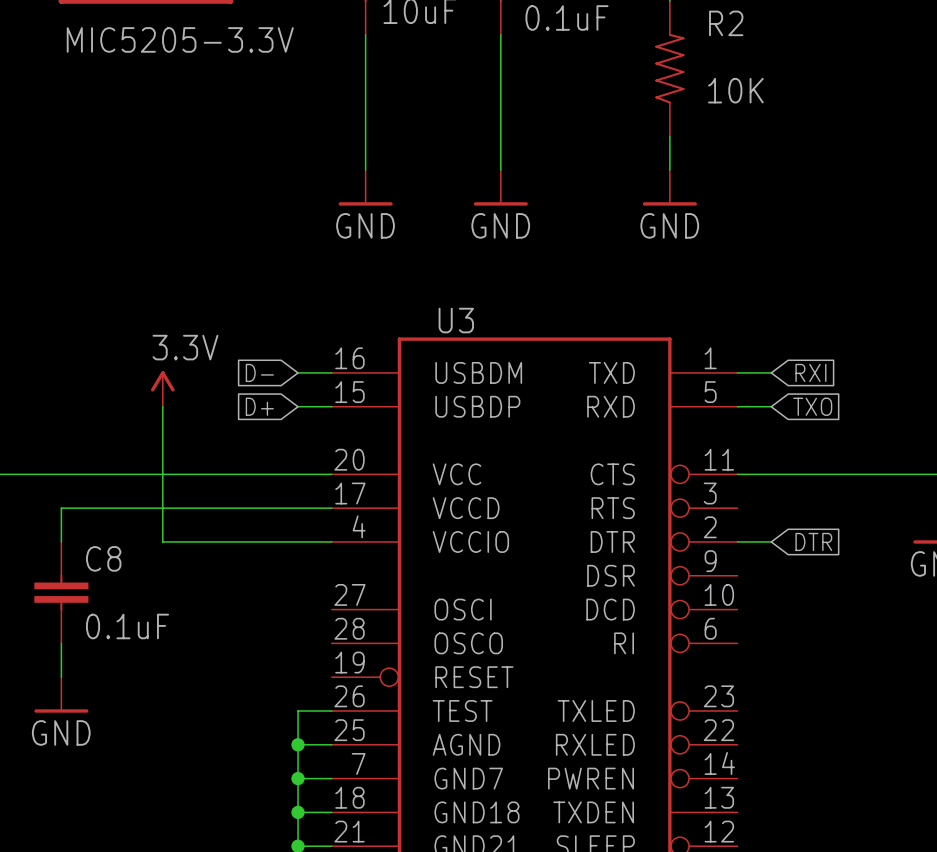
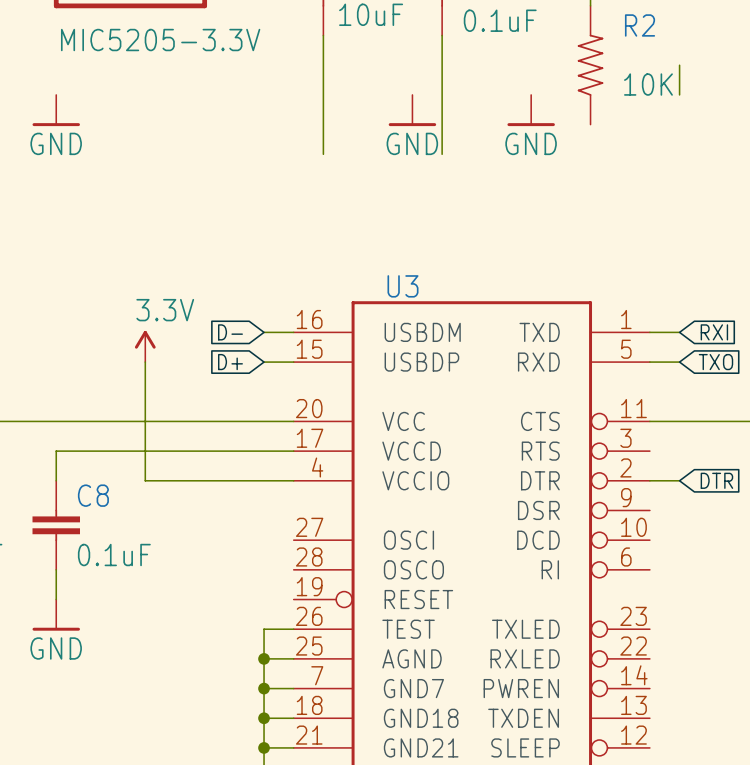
power symbol: none -> GND (56, 110)
power symbol: none -> GND (412, 110)
power symbol: none -> GND (531, 110)
wire: (669, 136) (669, 170) -> (679, 65) (679, 94)
power symbol: GND (365, 187) -> none
power symbol: GND (500, 187) -> none
power symbol: GND (669, 187) -> none

